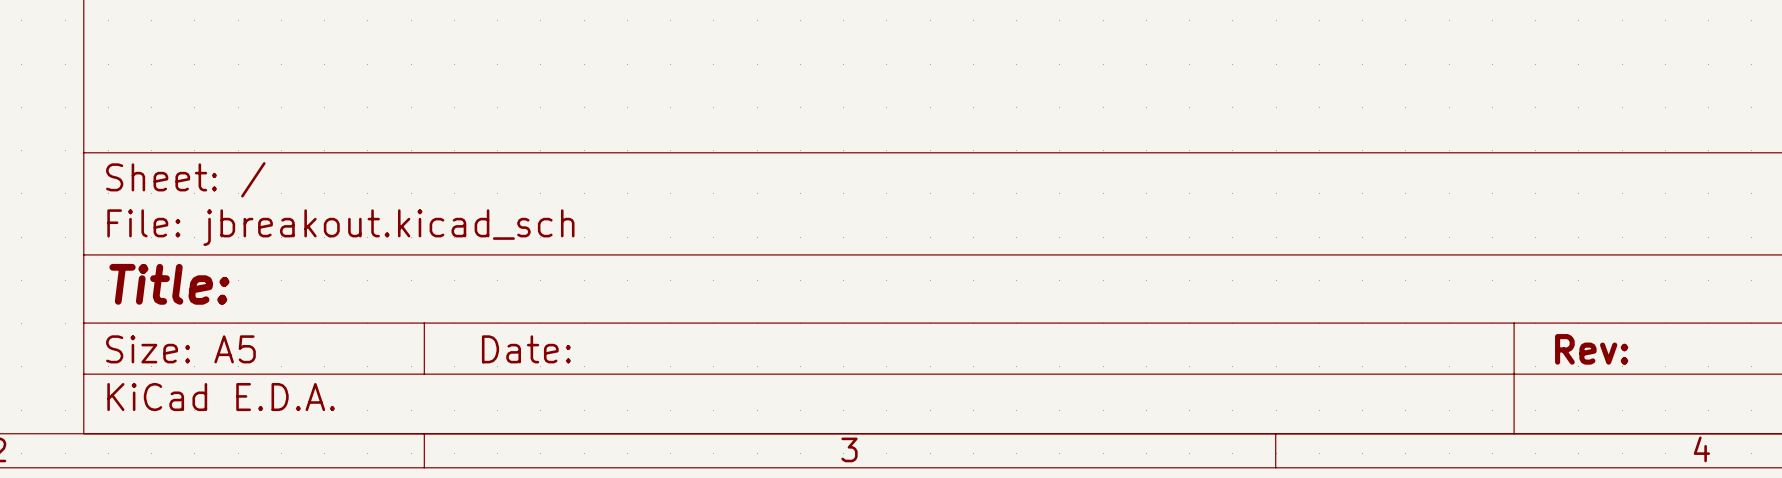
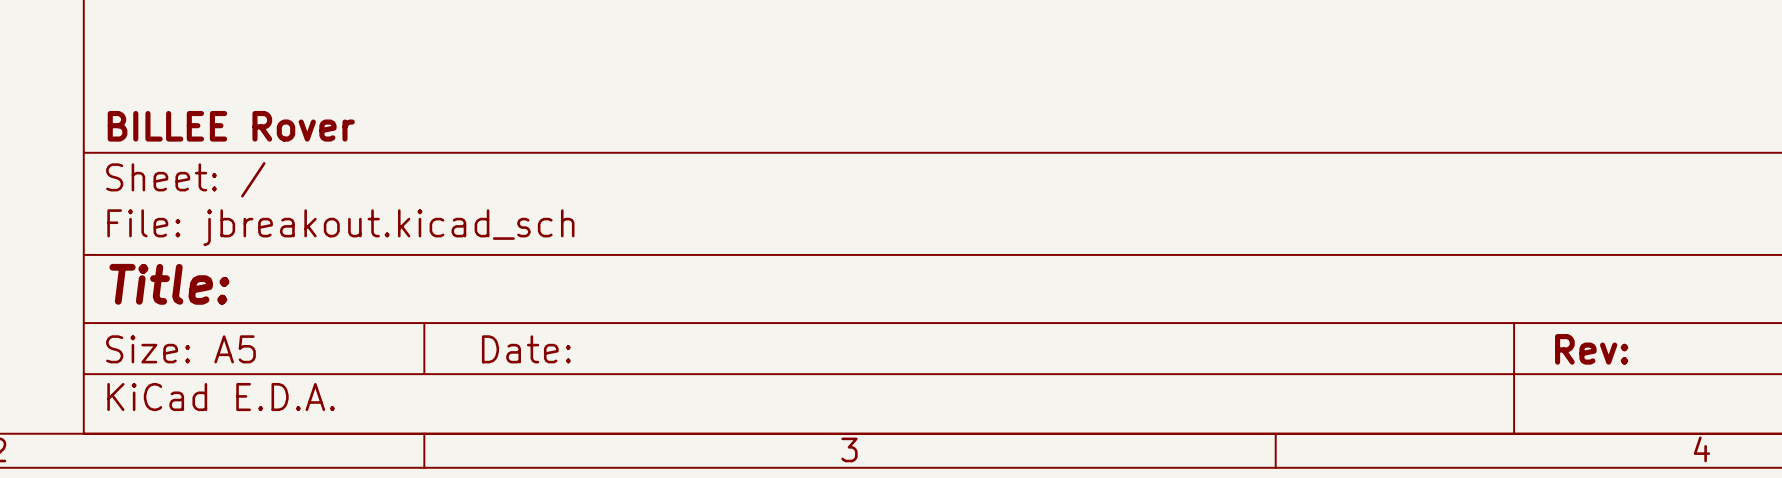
title block: none -> BILLEE Rover (231, 126)

